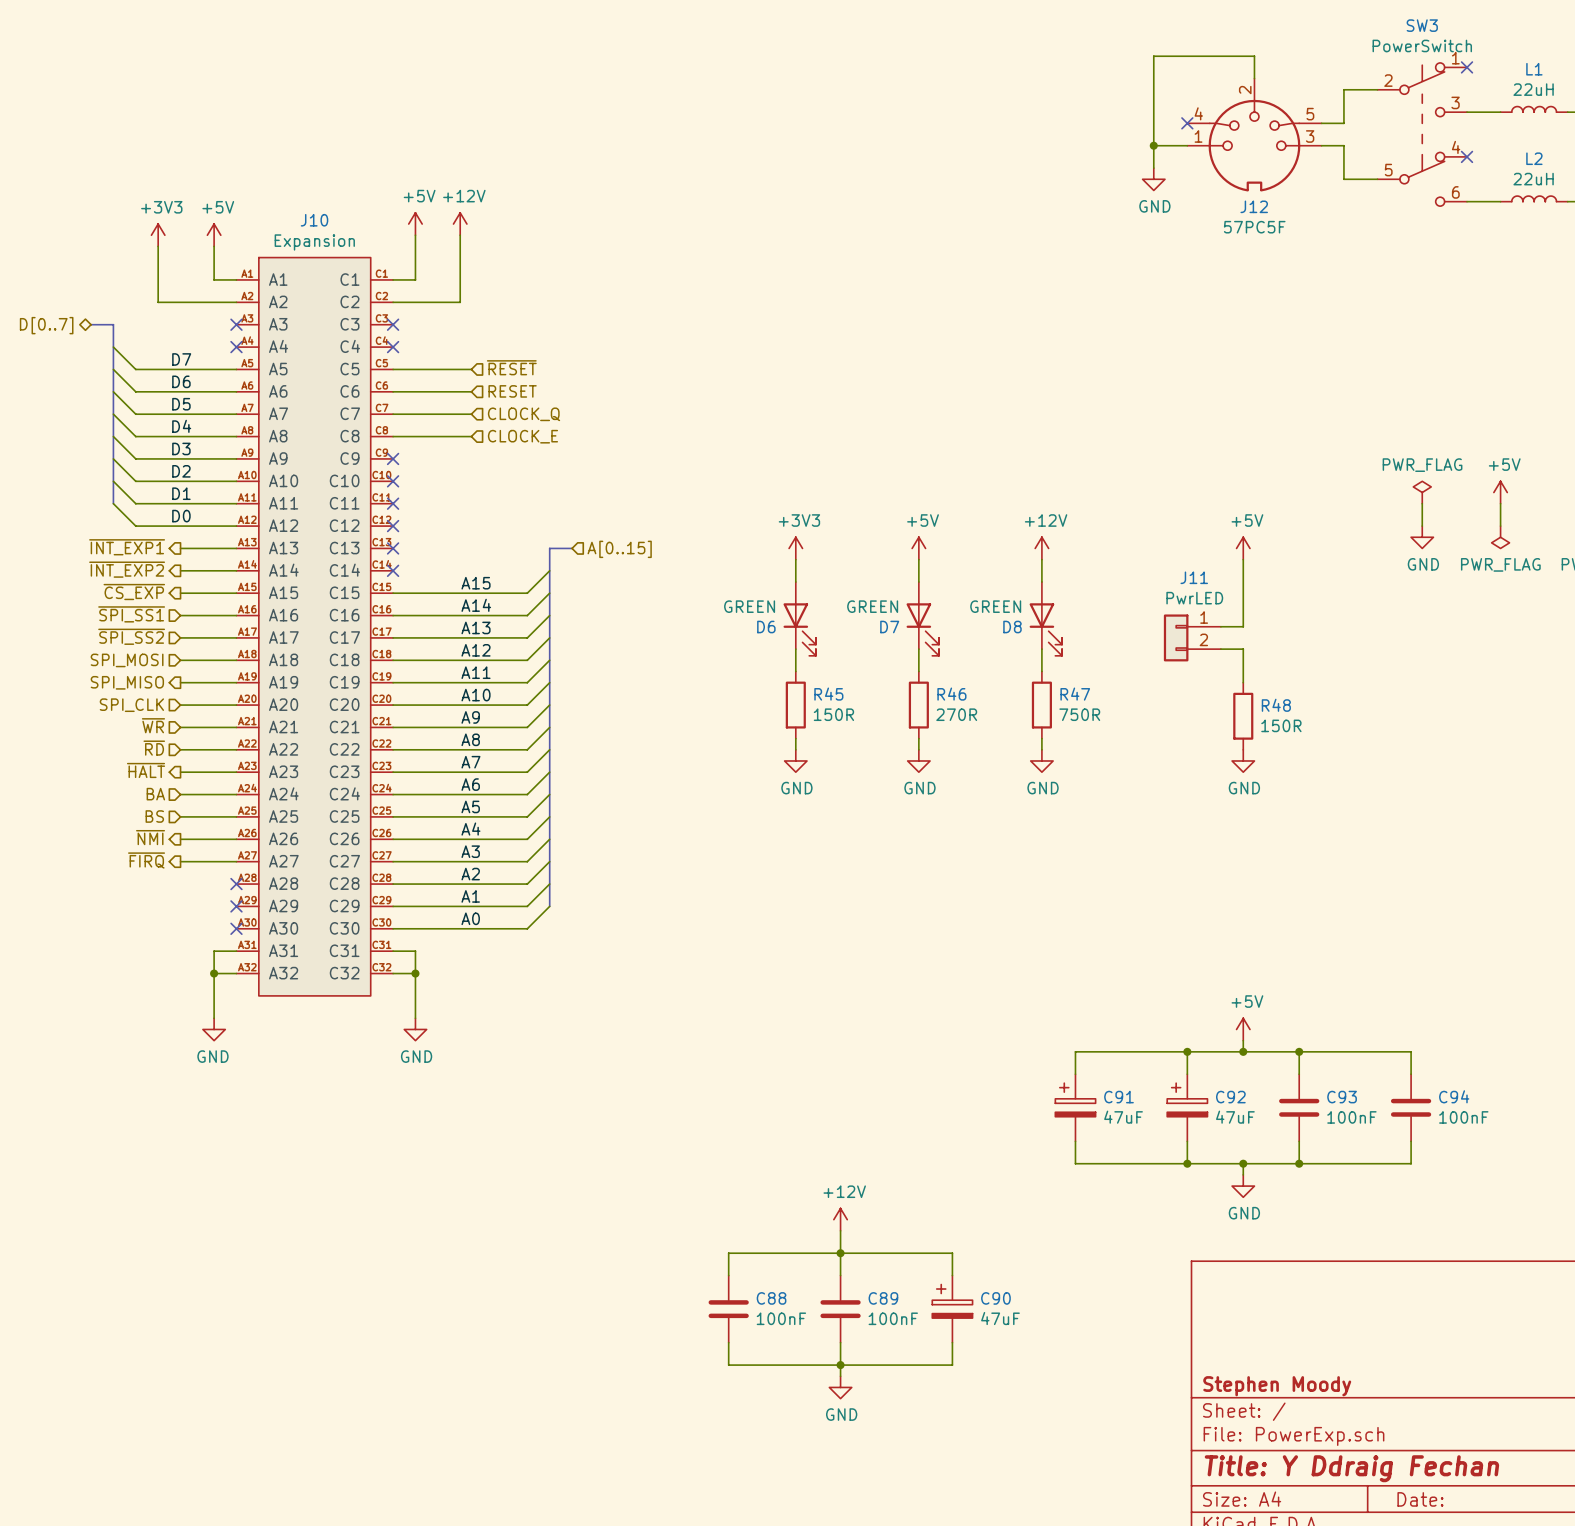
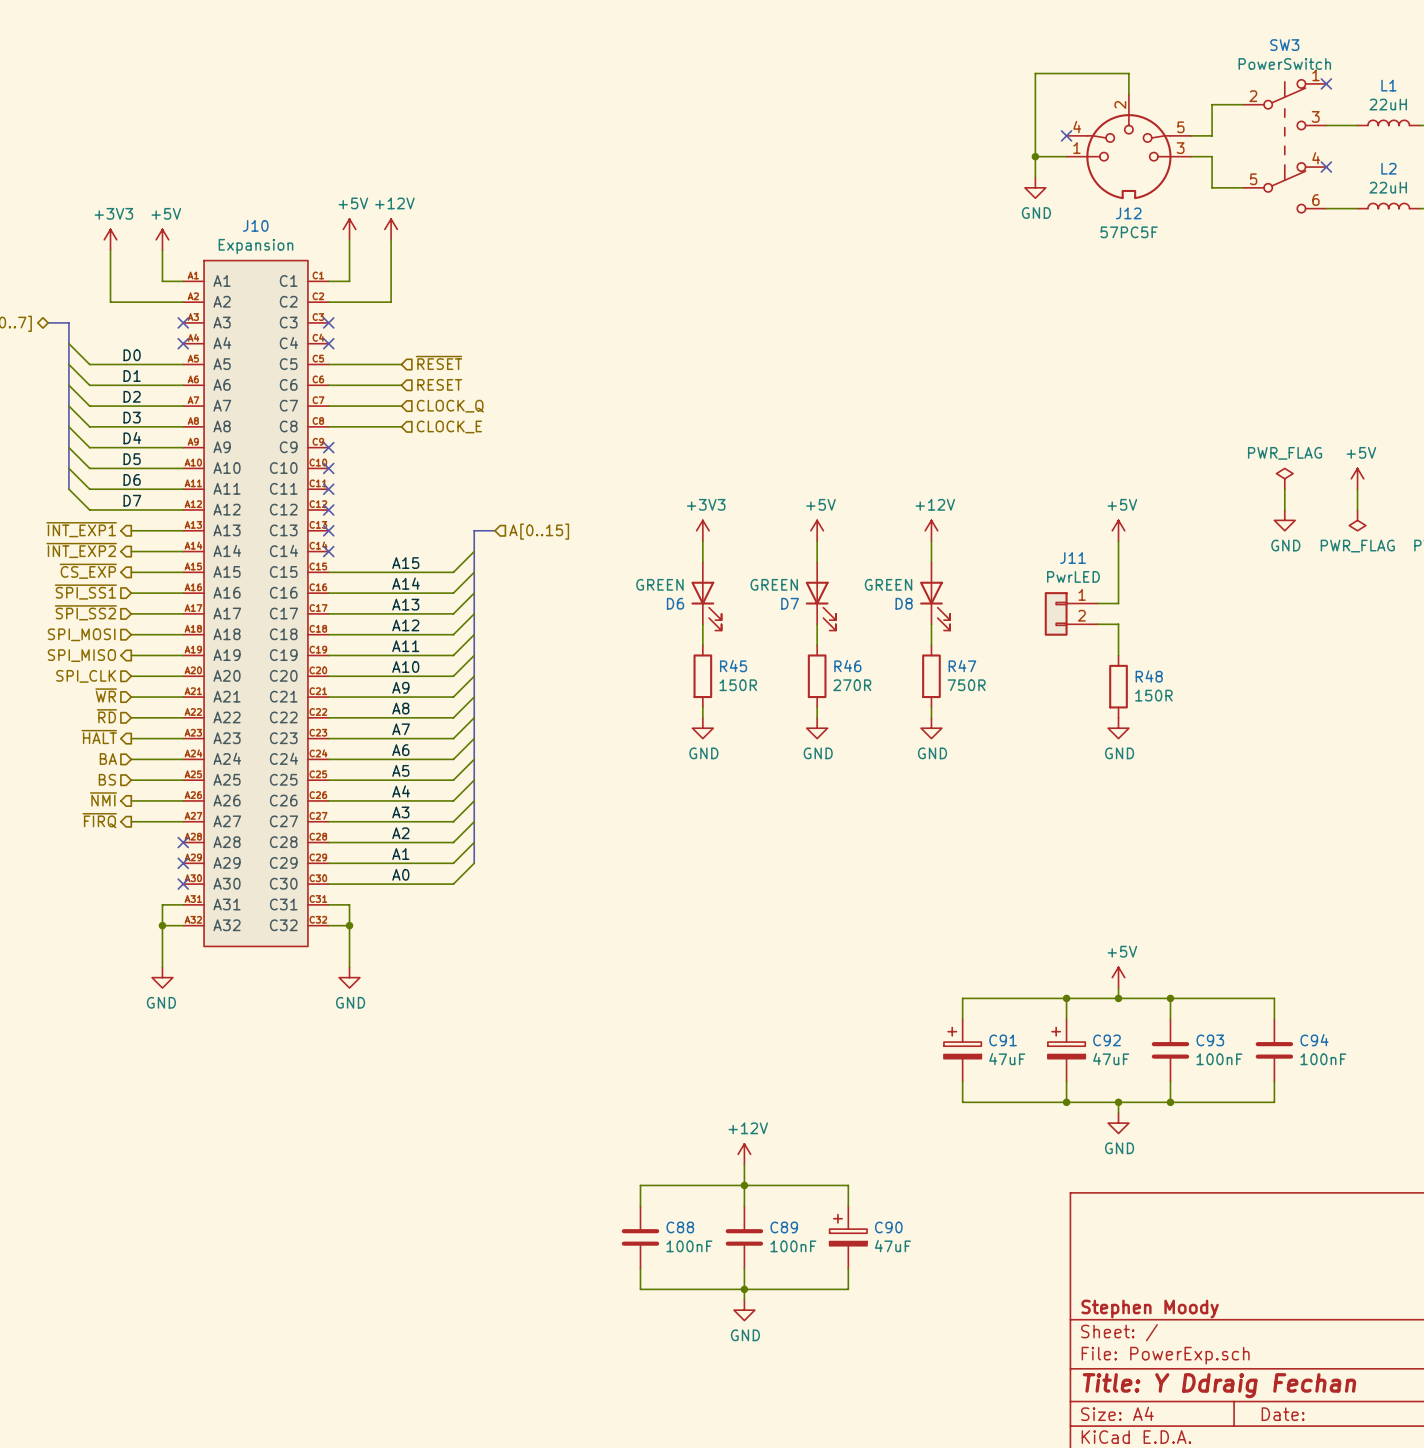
label: D7 (181, 359) -> D0 (132, 355)
label: D6 (181, 381) -> D1 (132, 376)
label: D5 (181, 404) -> D2 (132, 396)
label: D4 (181, 426) -> D3 (132, 417)
label: D3 (181, 448) -> D4 (132, 438)
label: D2 (181, 471) -> D5 (132, 459)
label: D1 (181, 493) -> D6 (132, 479)
label: D0 (181, 516) -> D7 (132, 500)

